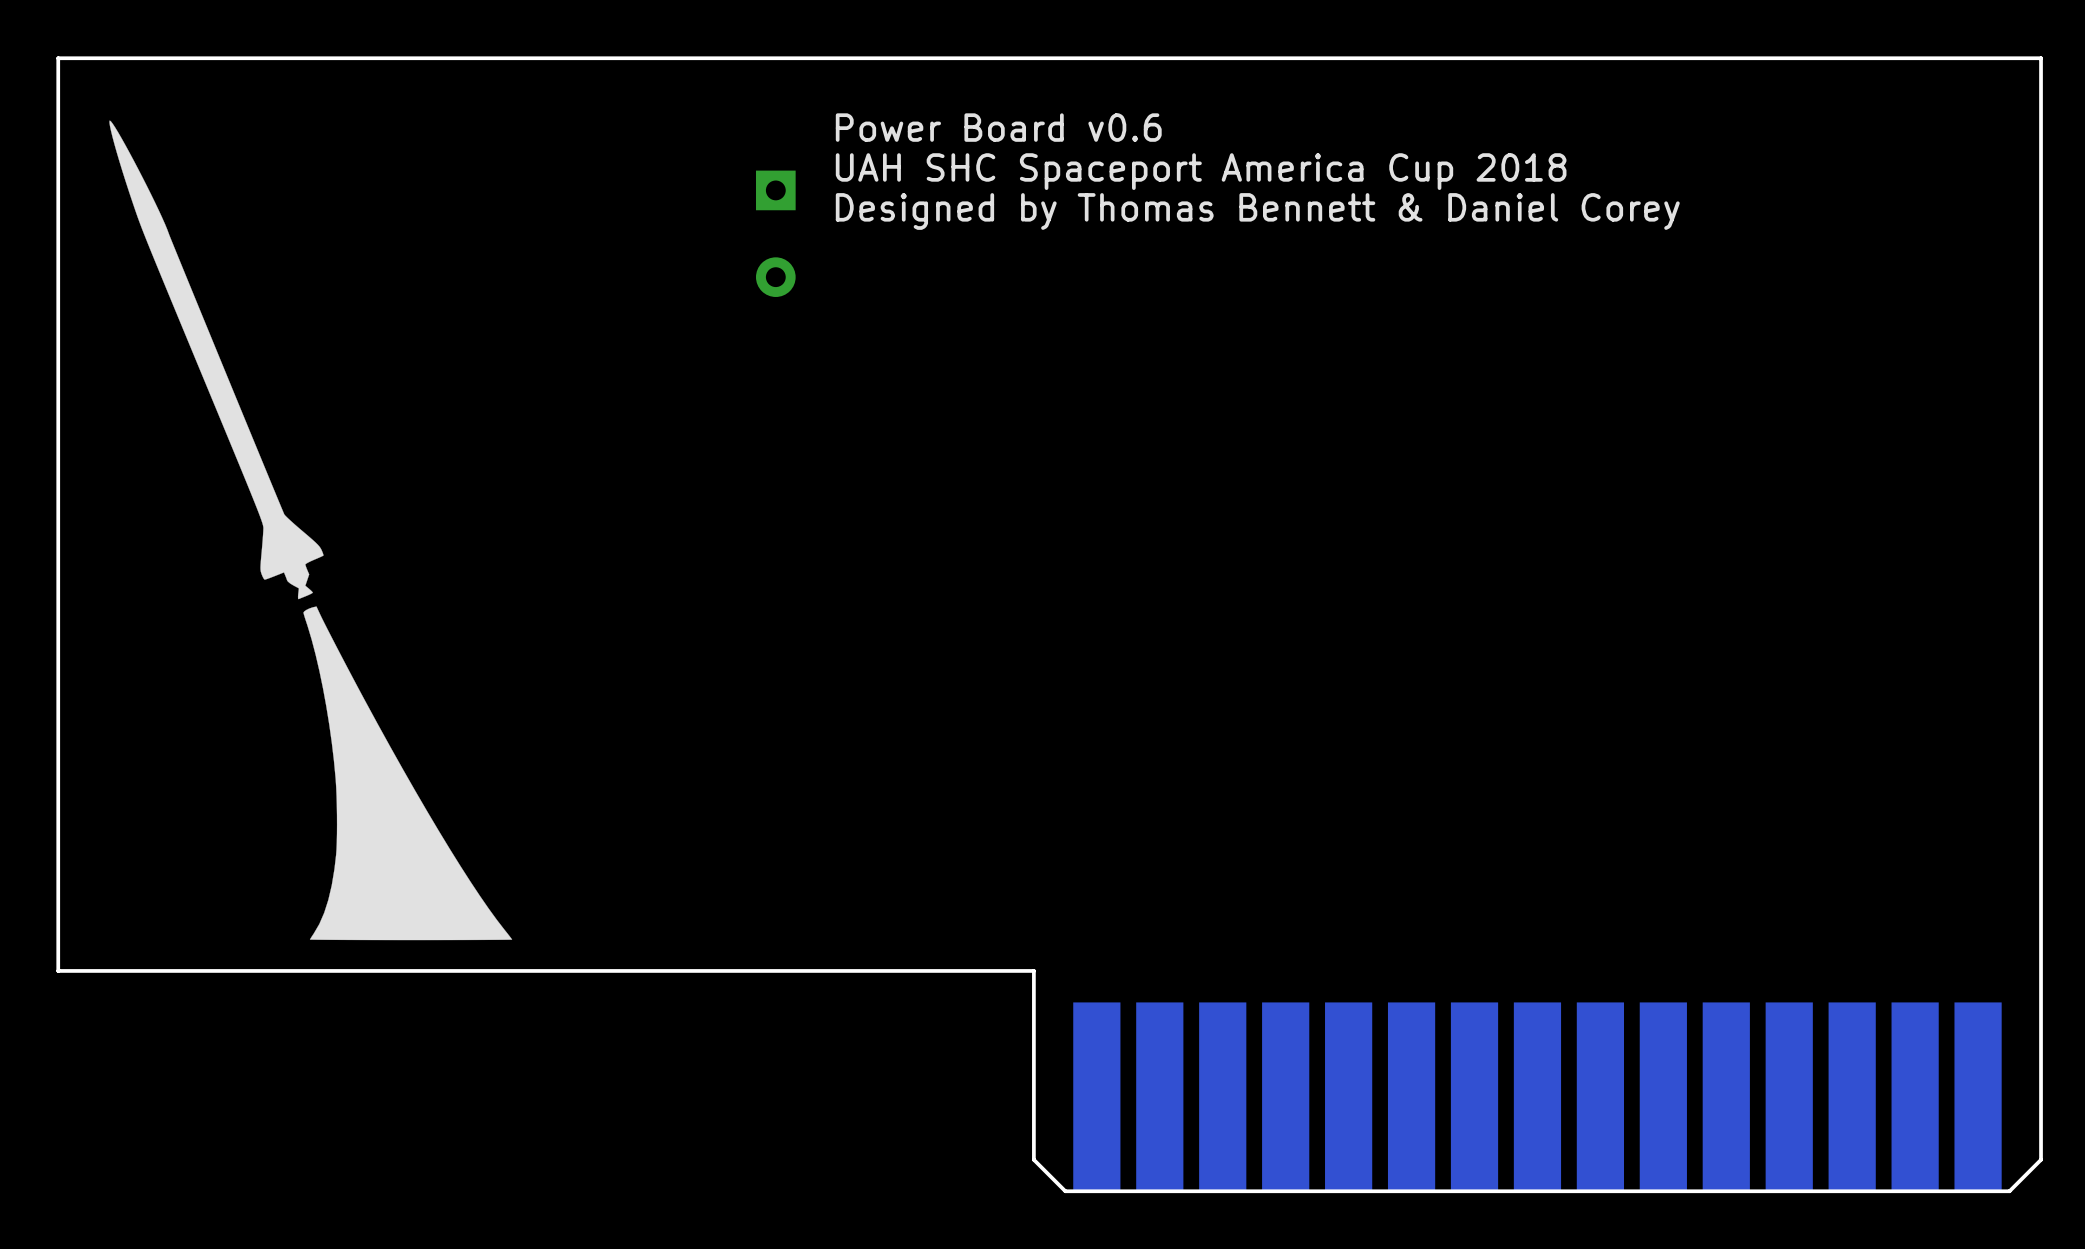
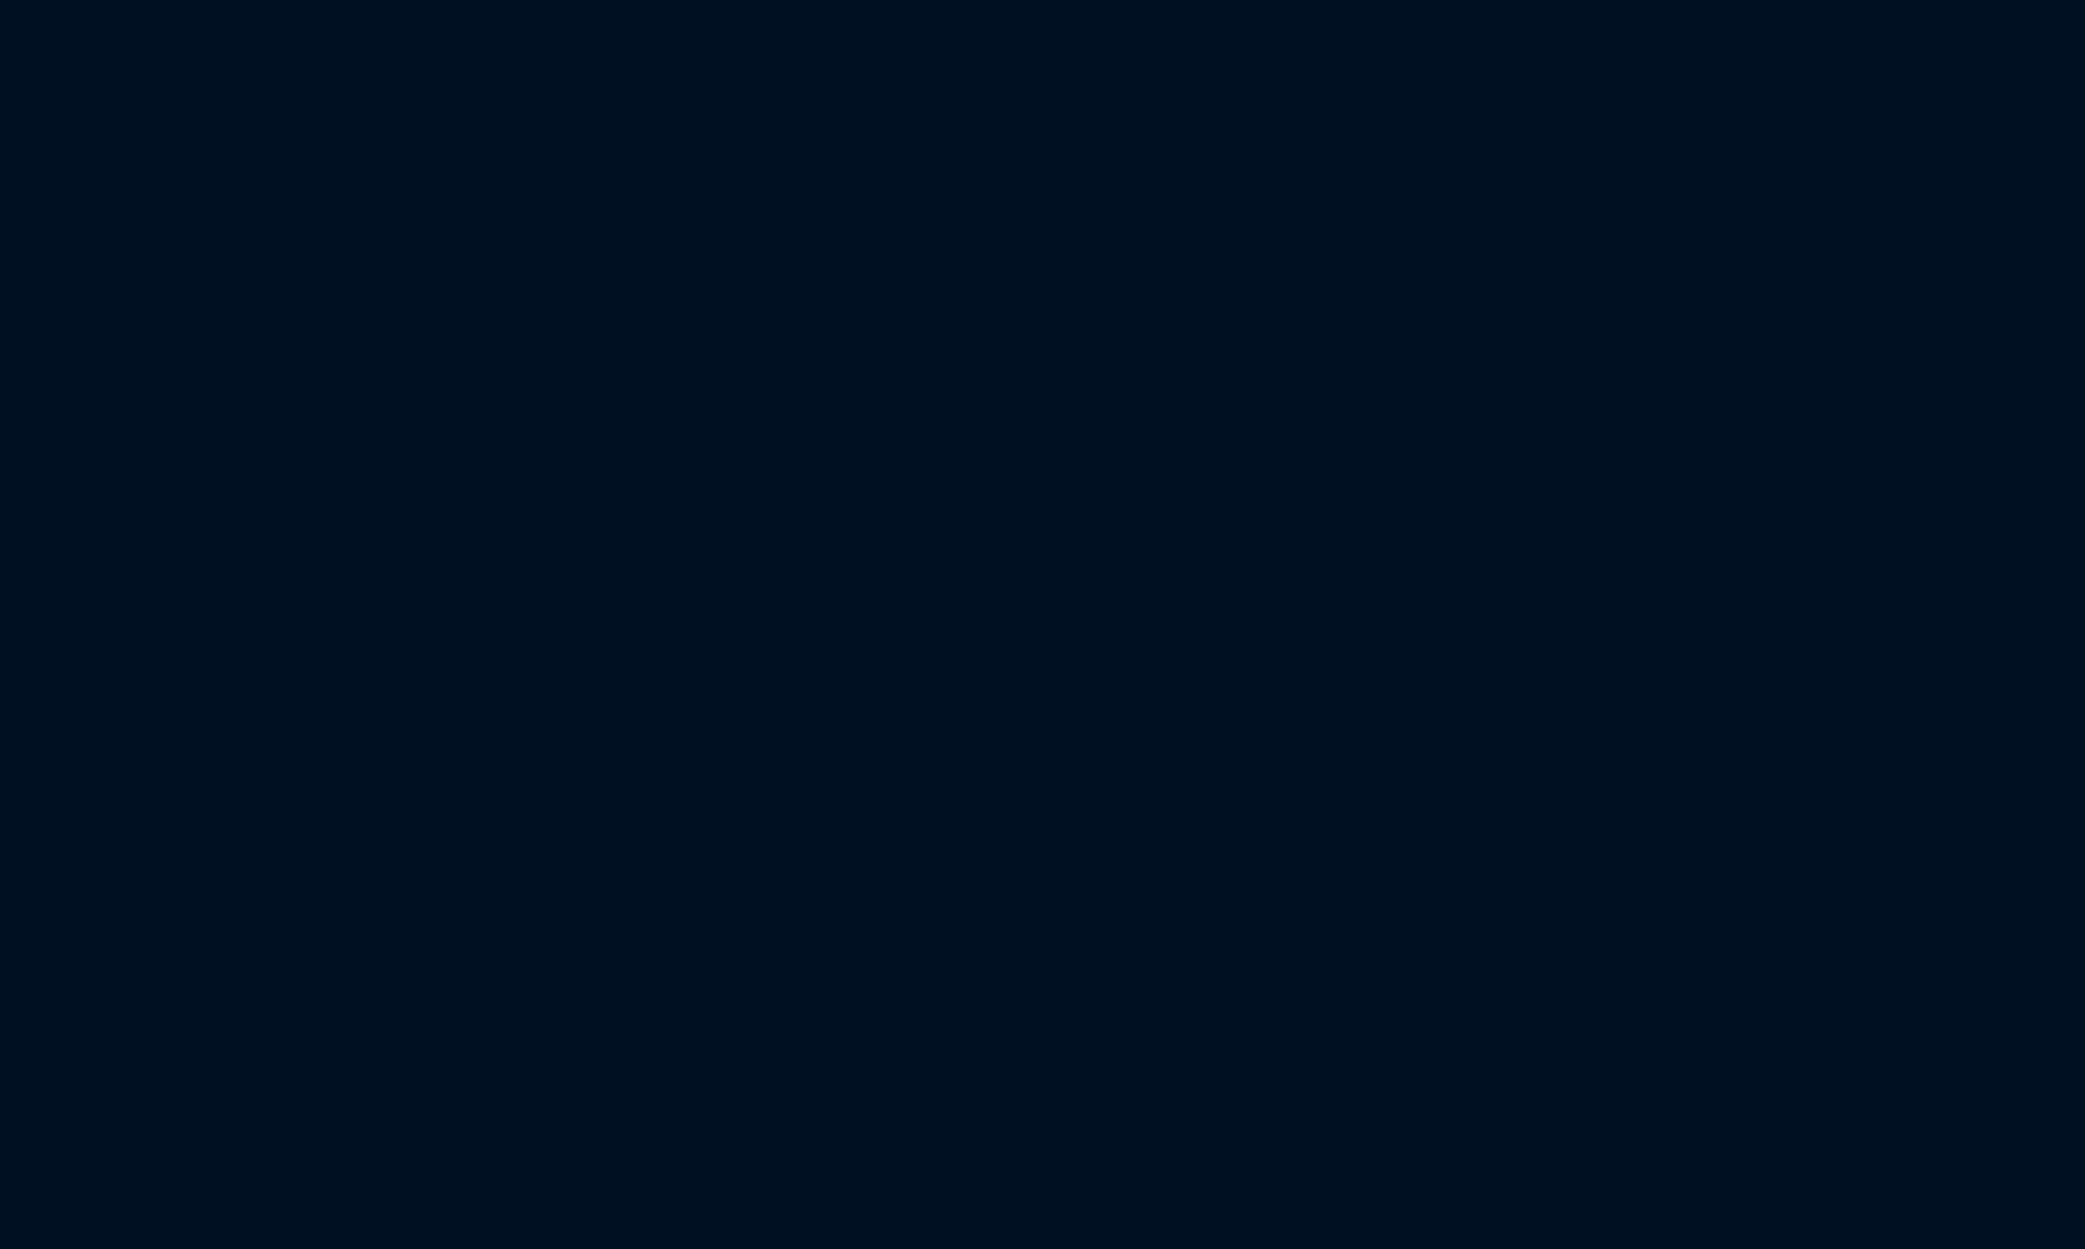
board edge: (2041, 58) (2041, 1159) (2009, 1191) (1065, 1191) (1033, 1159) (1033, 970) (58, 970) (58, 58) (2041, 58) -> none
drawing: [109, 120, 513, 941] -> none
text: Power Board v0.6 (998, 127) -> none
text: UAH SHC Spaceport America Cup 2018 (1201, 171) -> none
text: Designed by Thomas Bennett & Daniel Corey (1257, 211) -> none
part: (775, 233) -> none
part: (1537, 1096) -> none

